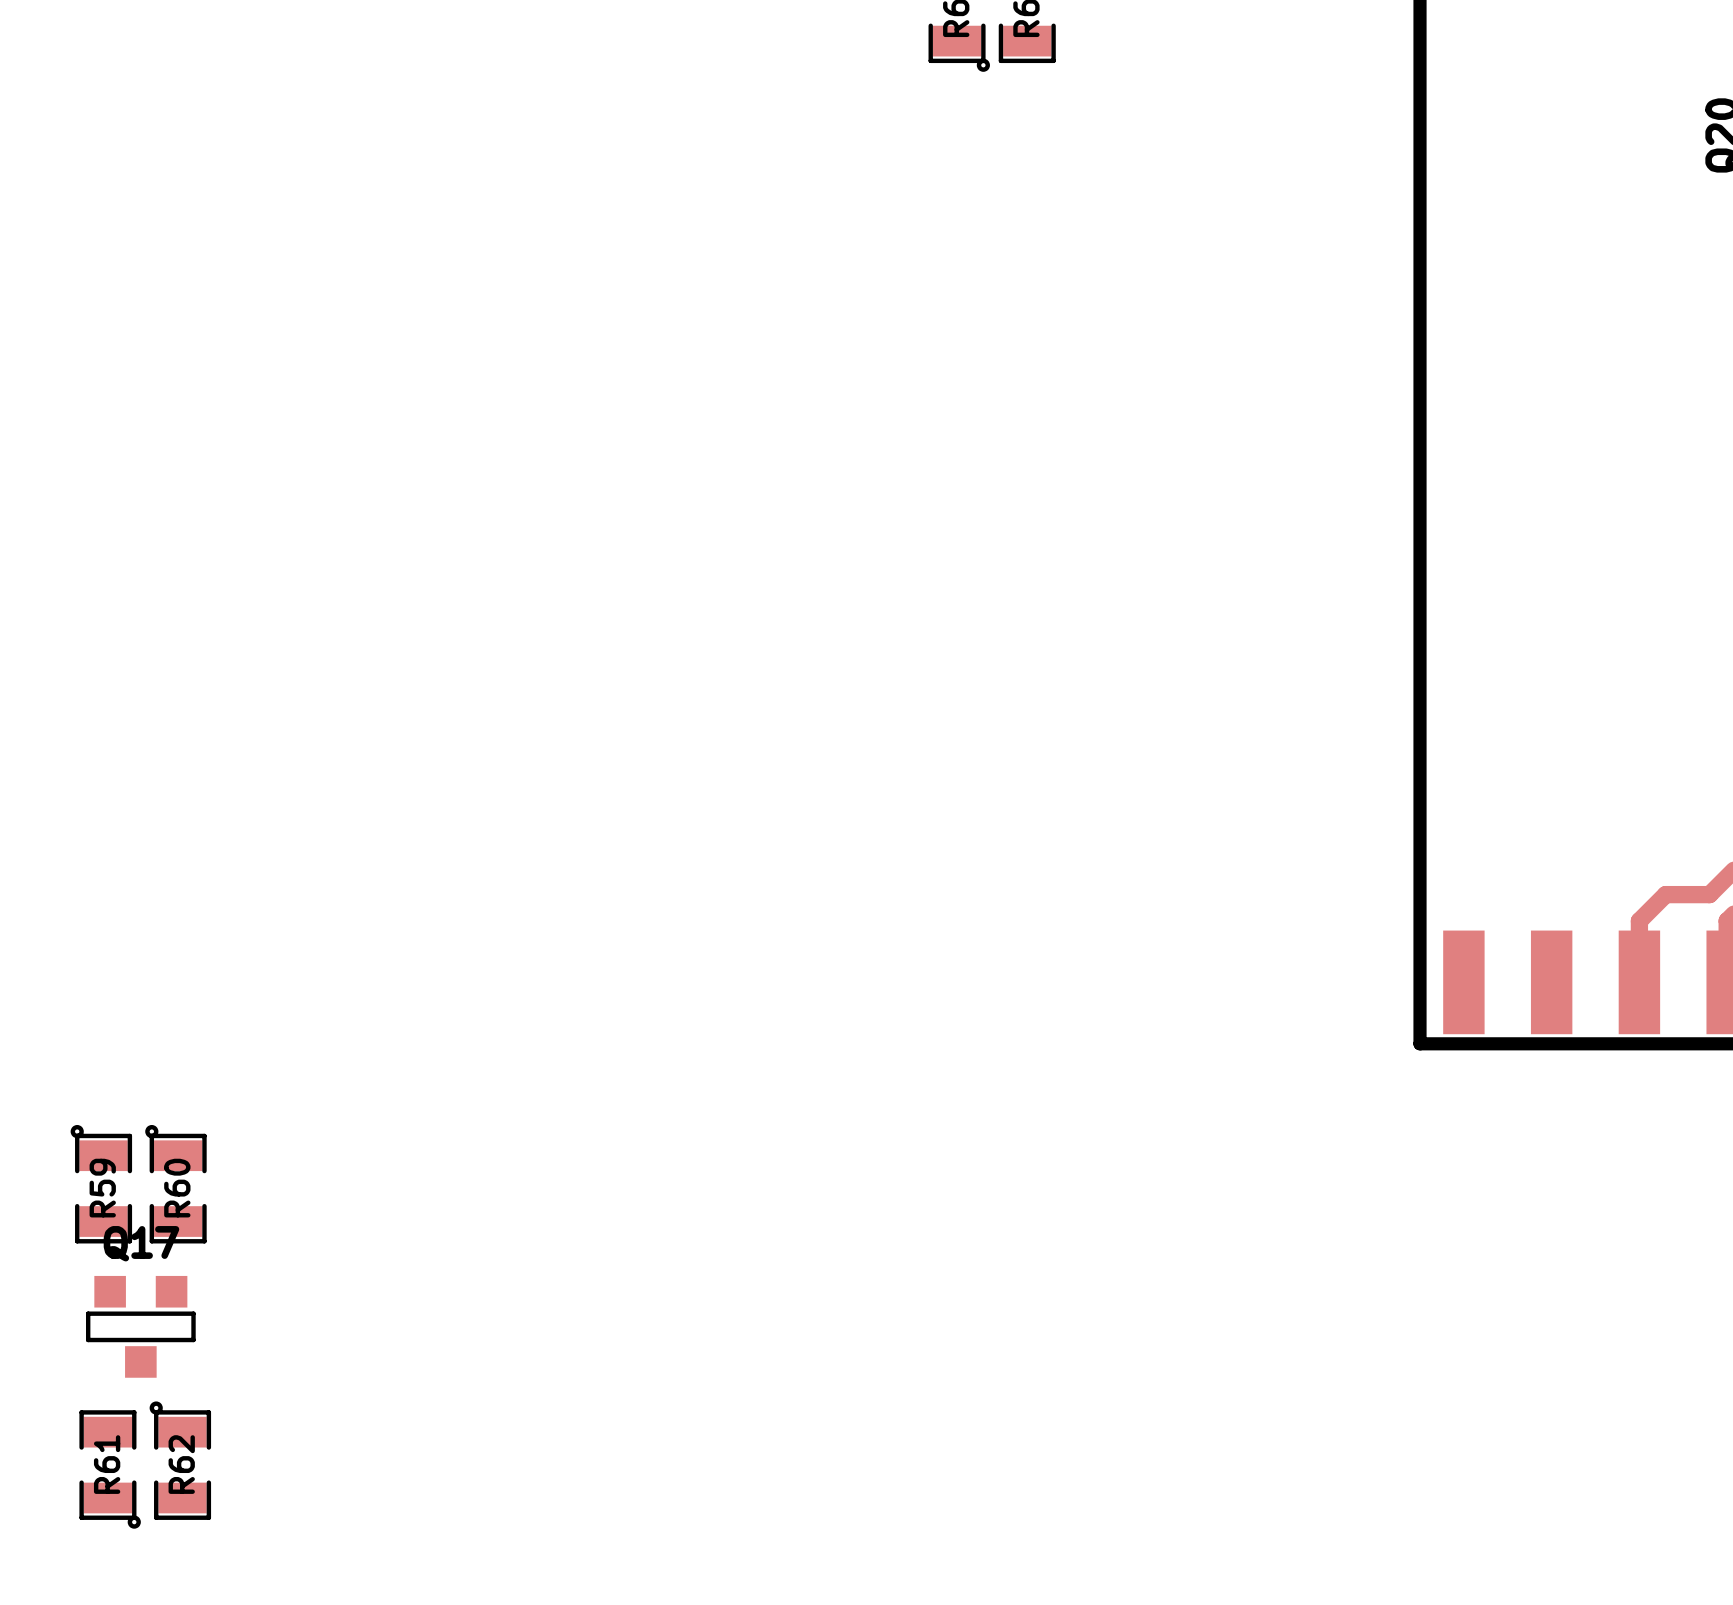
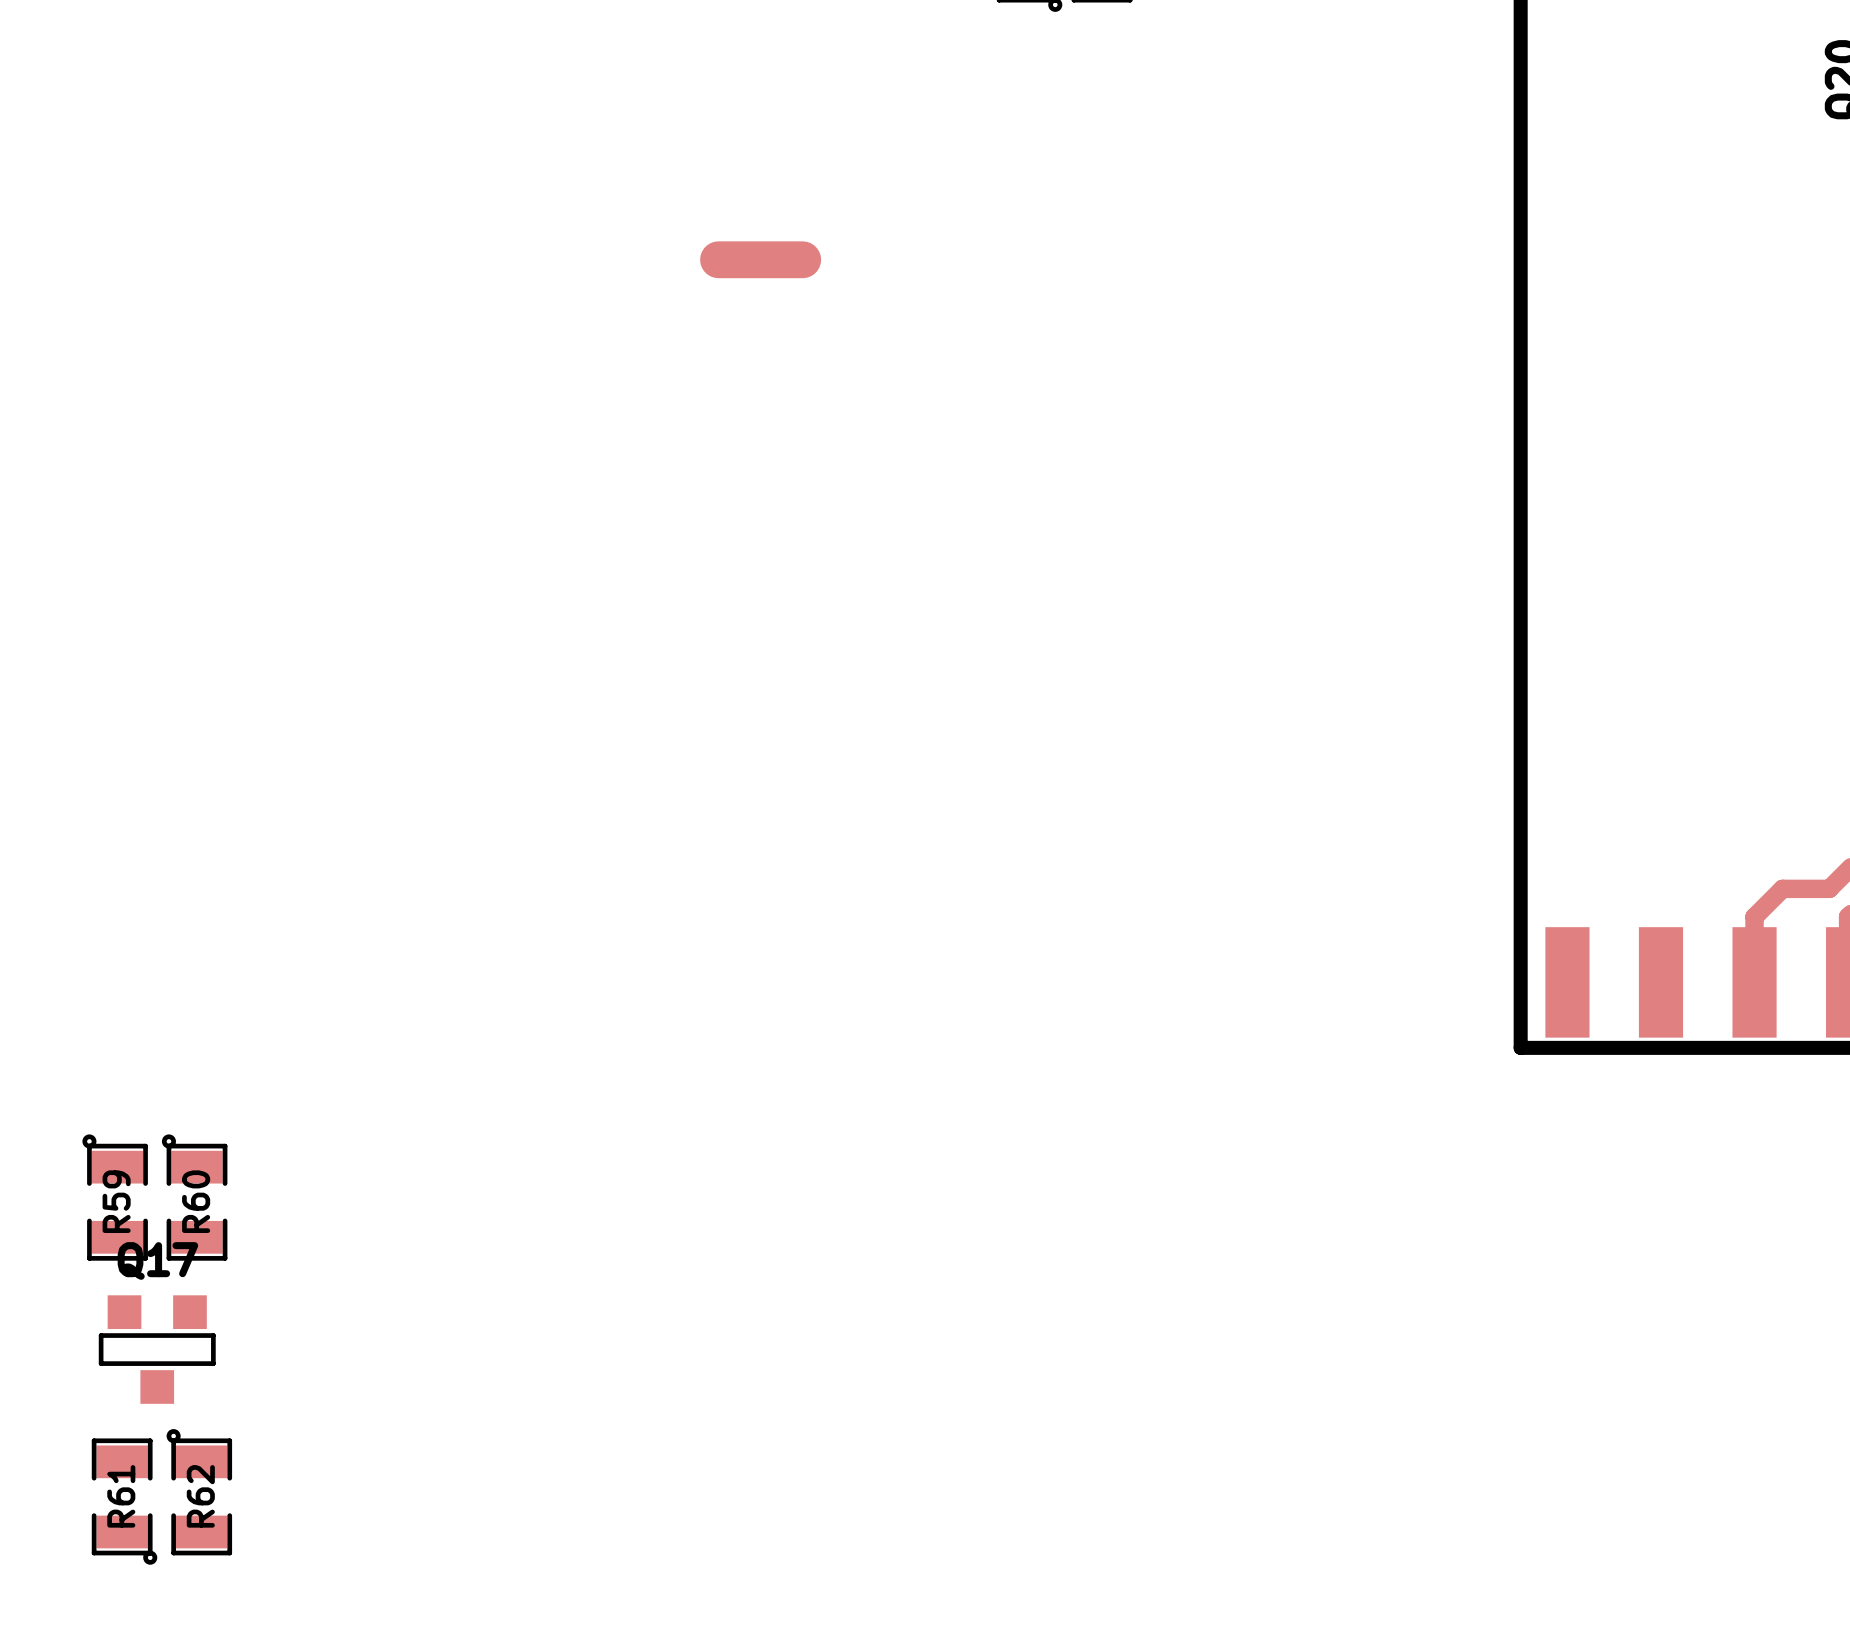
top track: none -> (718, 259) (802, 259)

